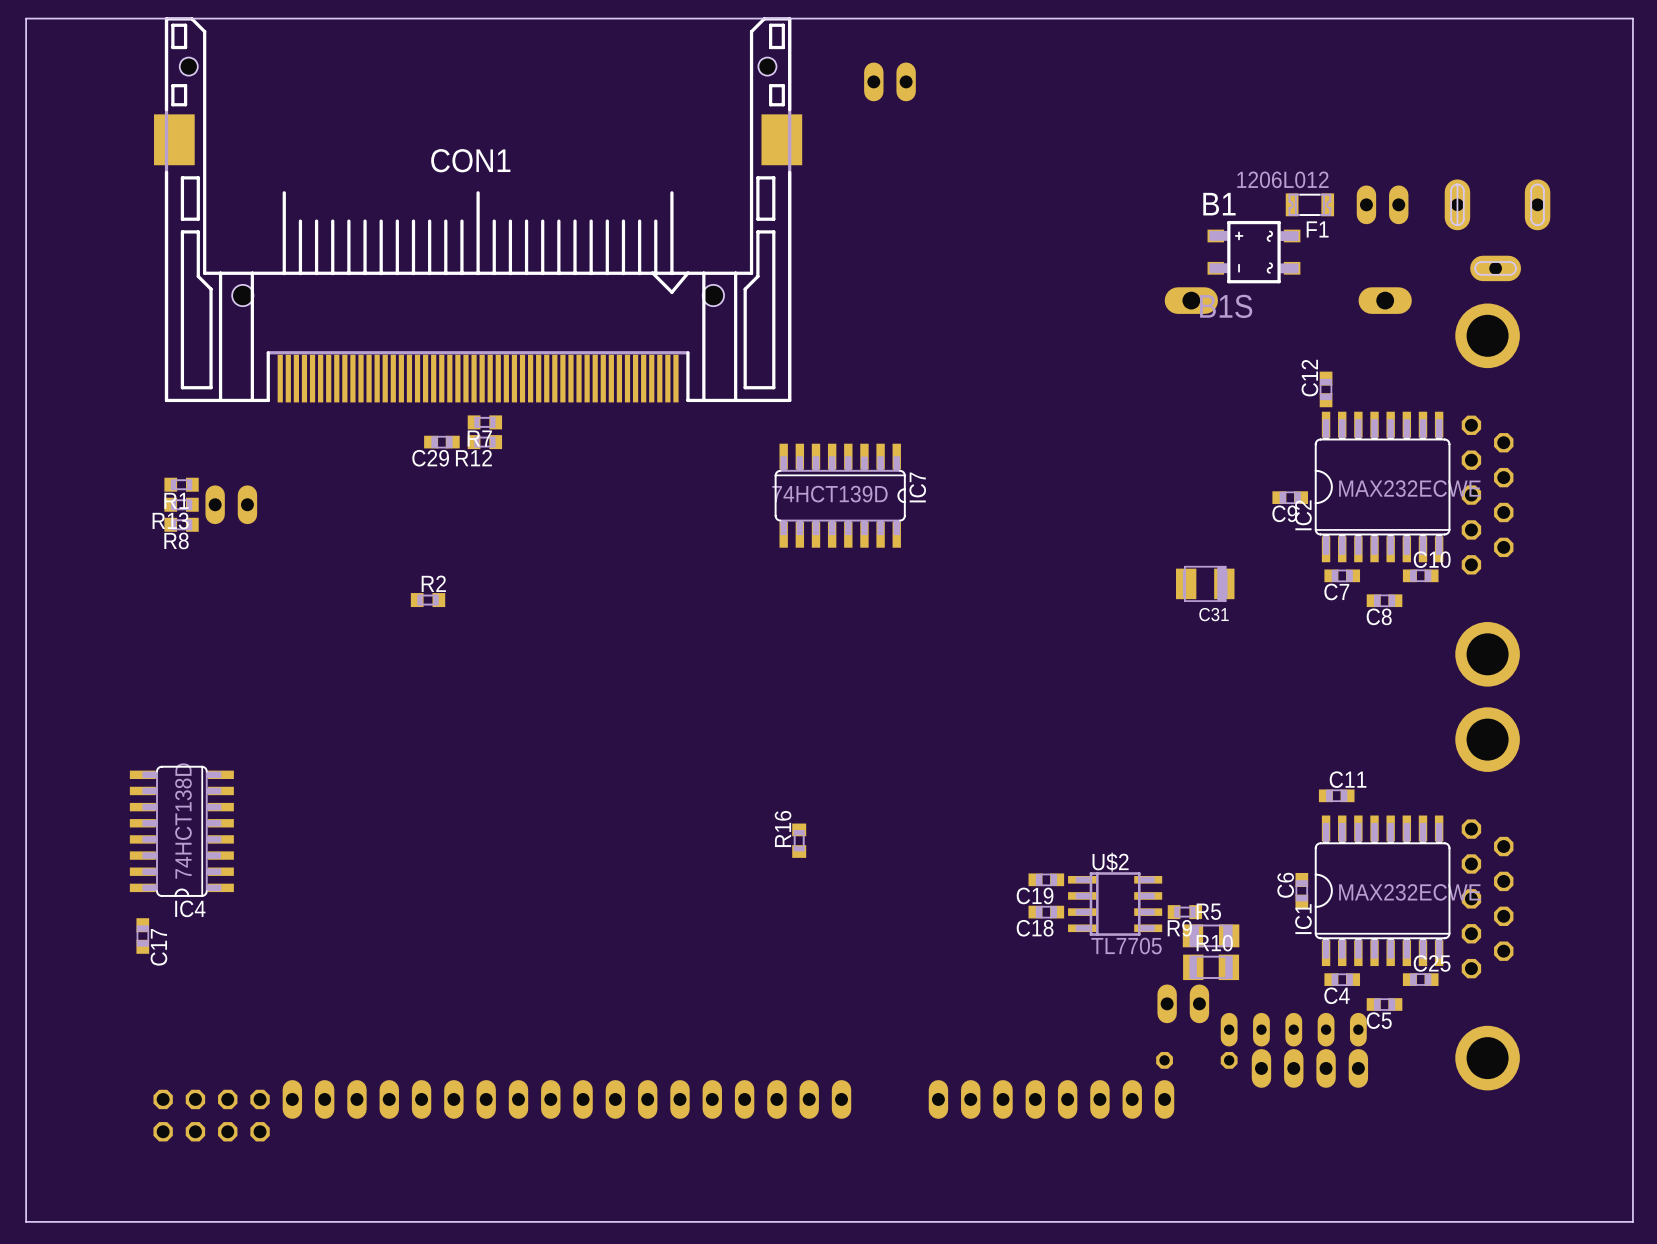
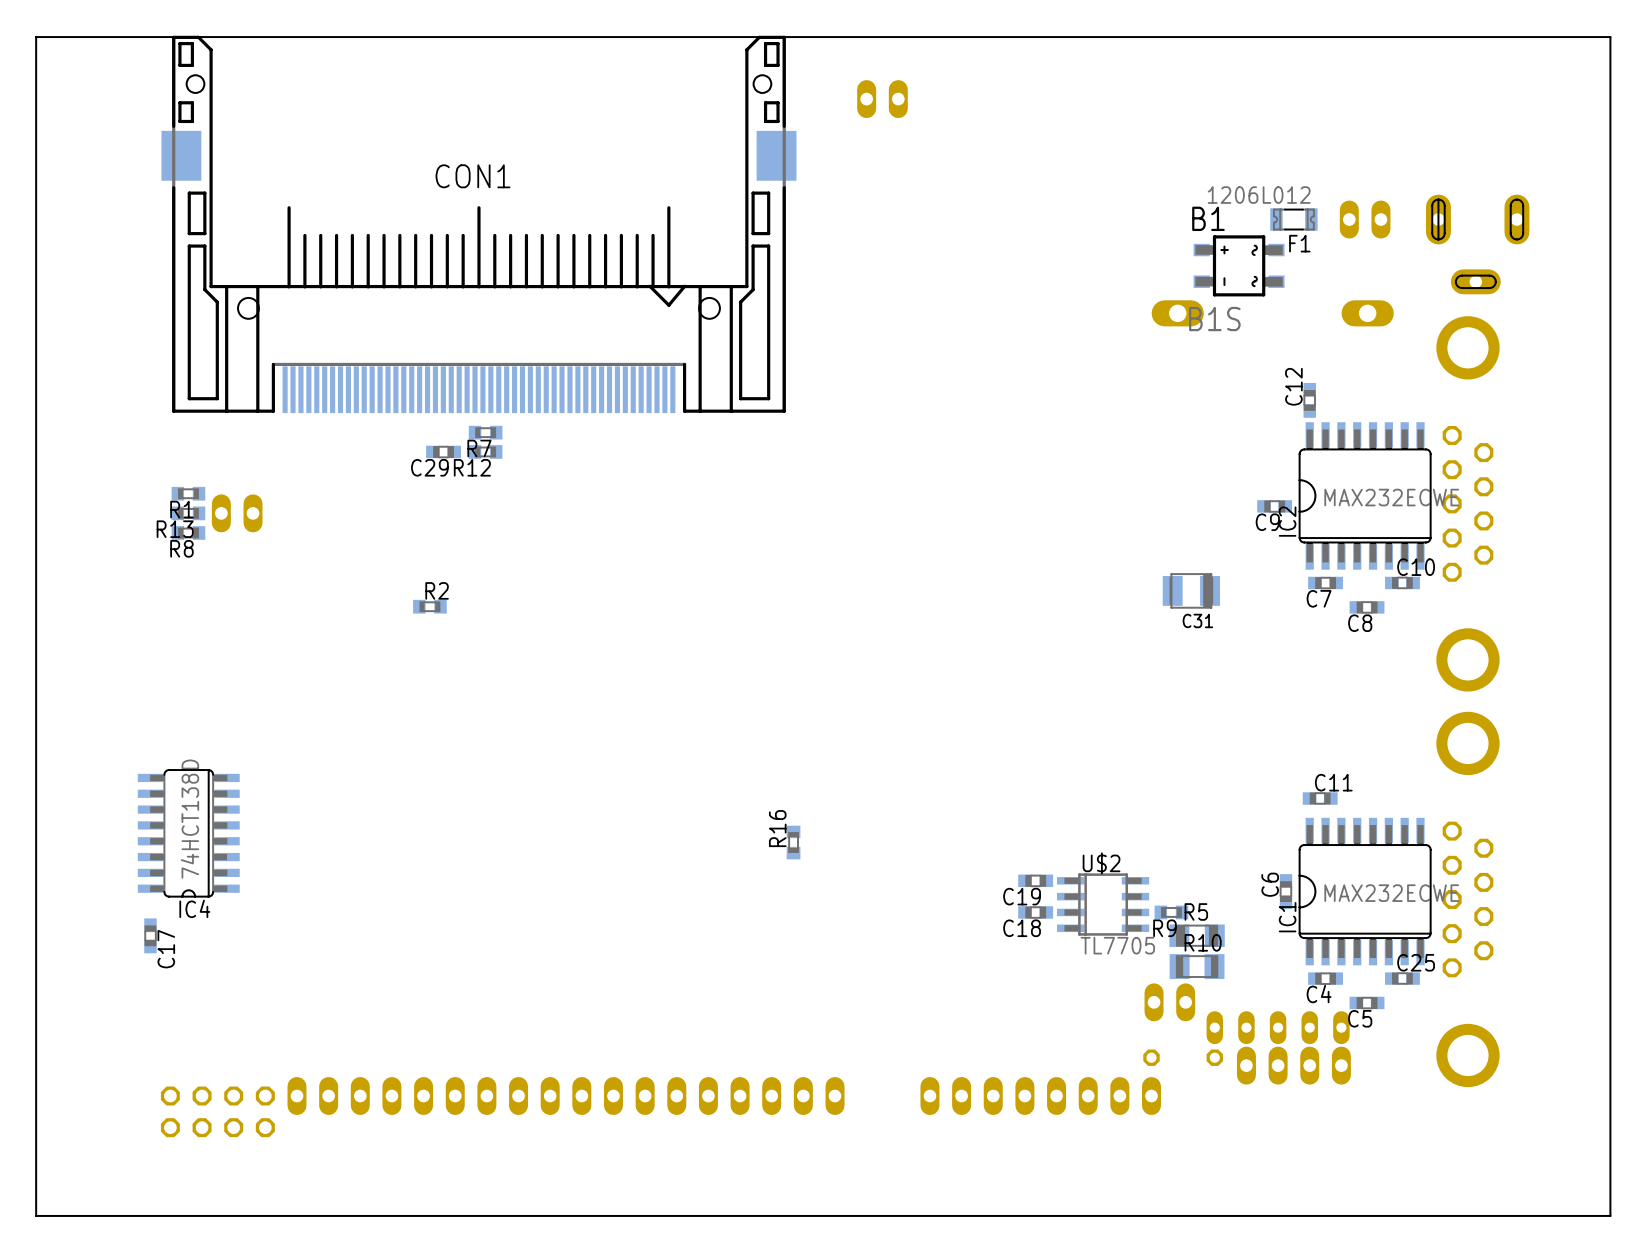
IC7: 74HCT139D (840, 495) -> none

